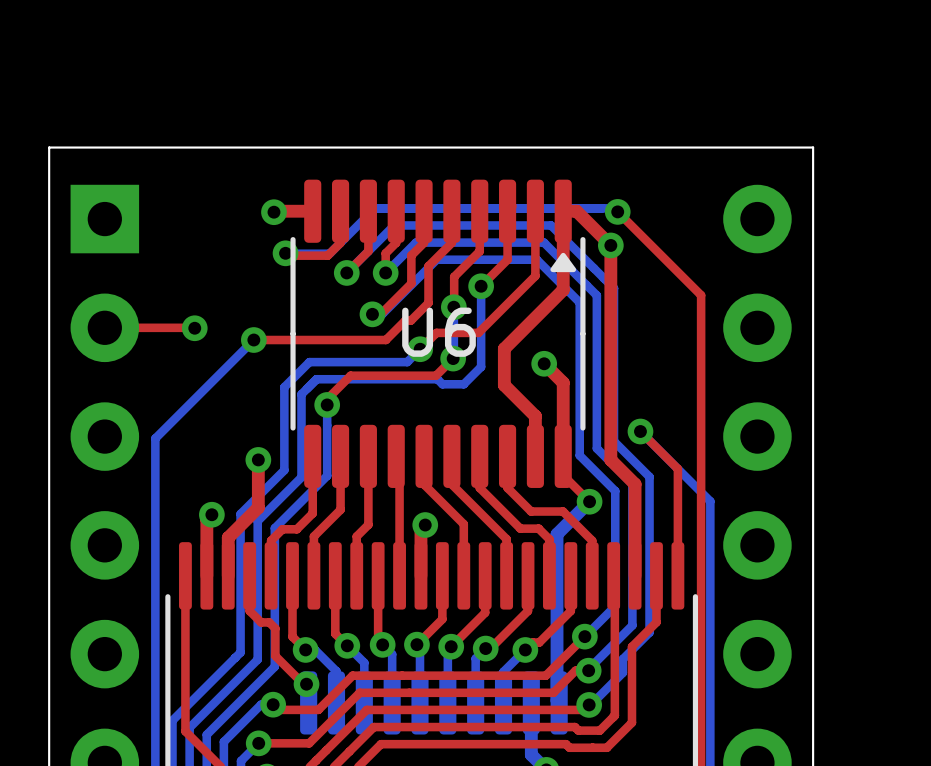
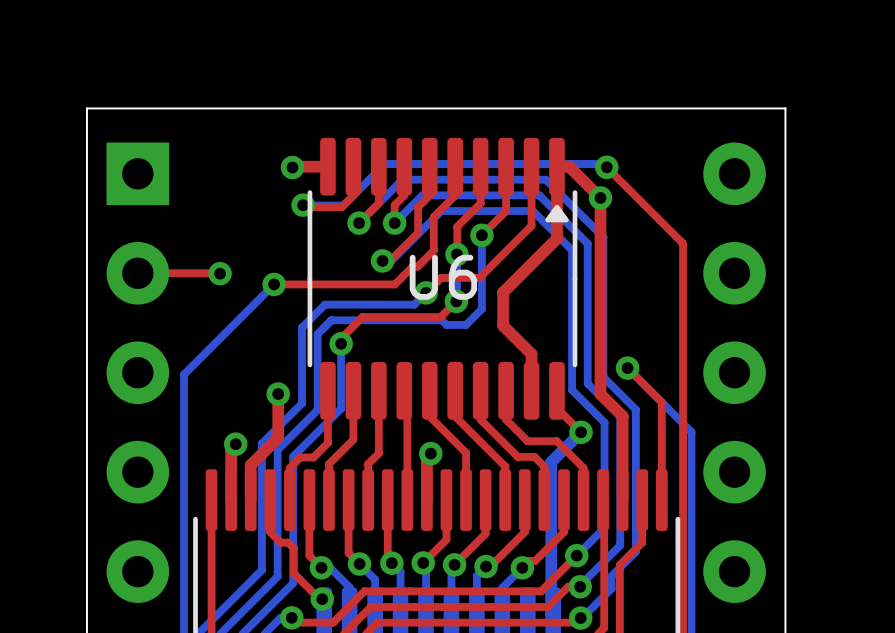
top track: (544, 363) (563, 382) (563, 456) -> none
via: (544, 363) -> none

